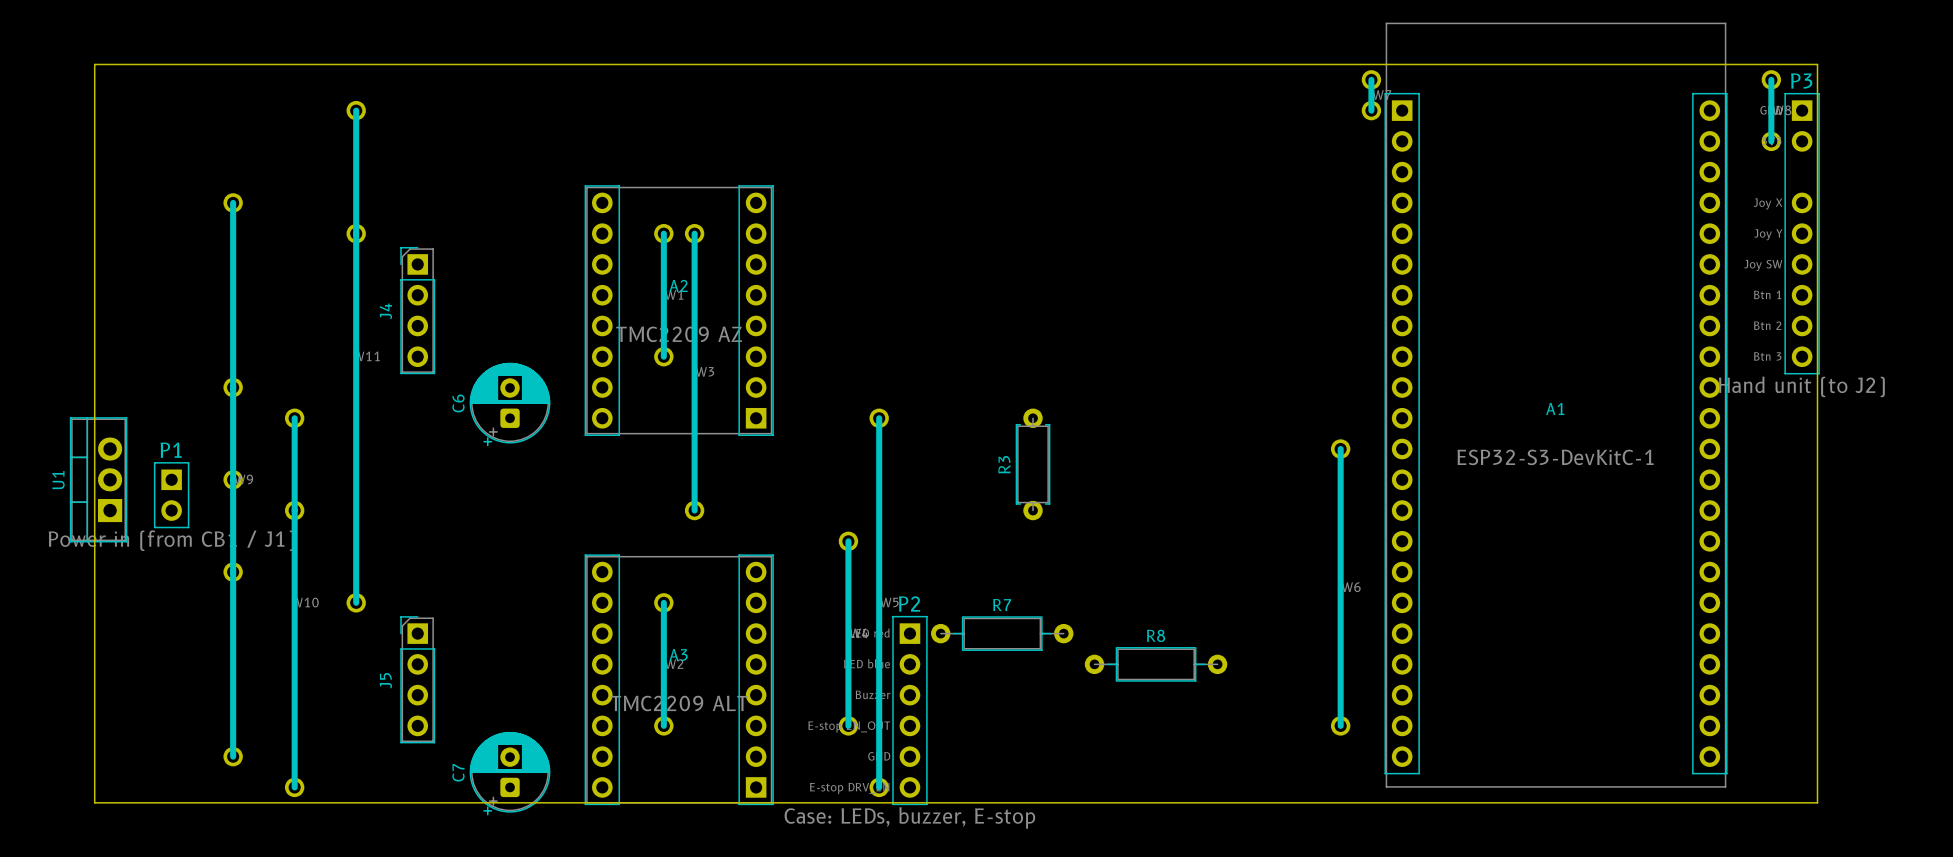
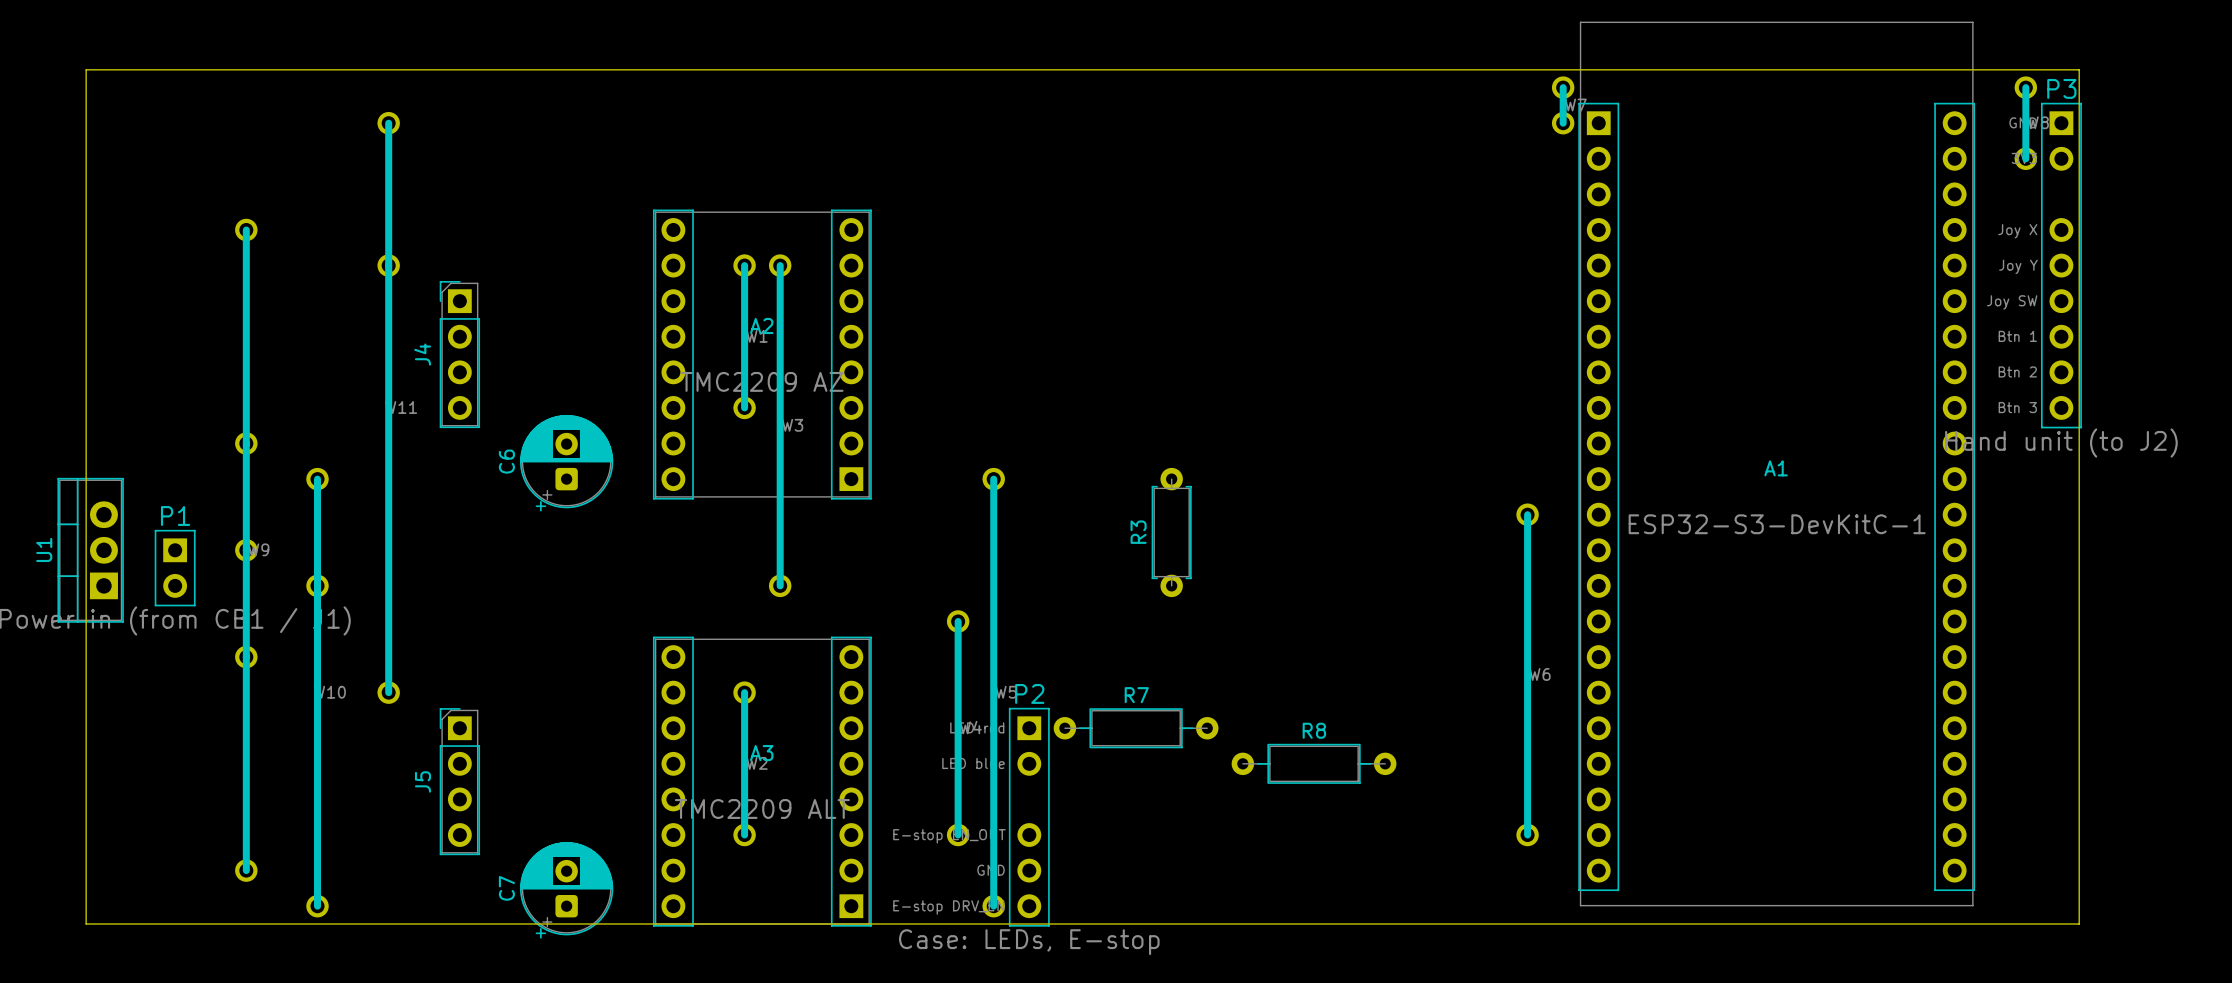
P2 footprint: [892, 615, 928, 806] -> [1008, 707, 1050, 927]
P2 value: Case: LEDs, buzzer, E-stop (909, 817) -> Case: LEDs, E-stop (1029, 942)

